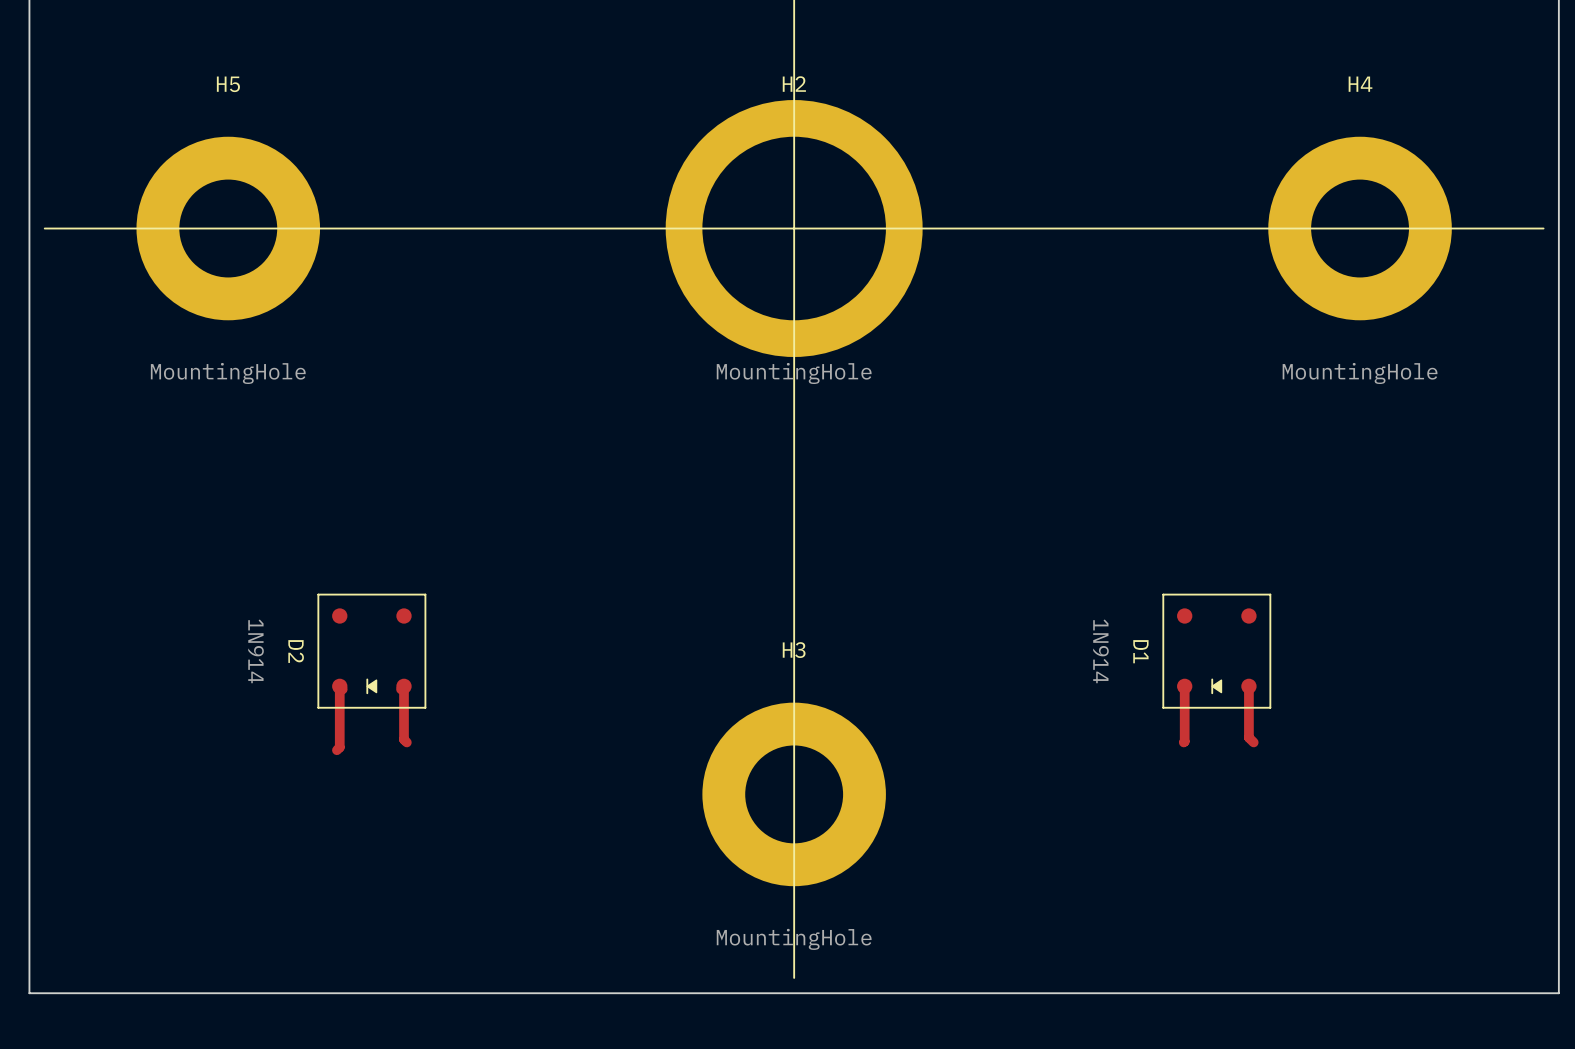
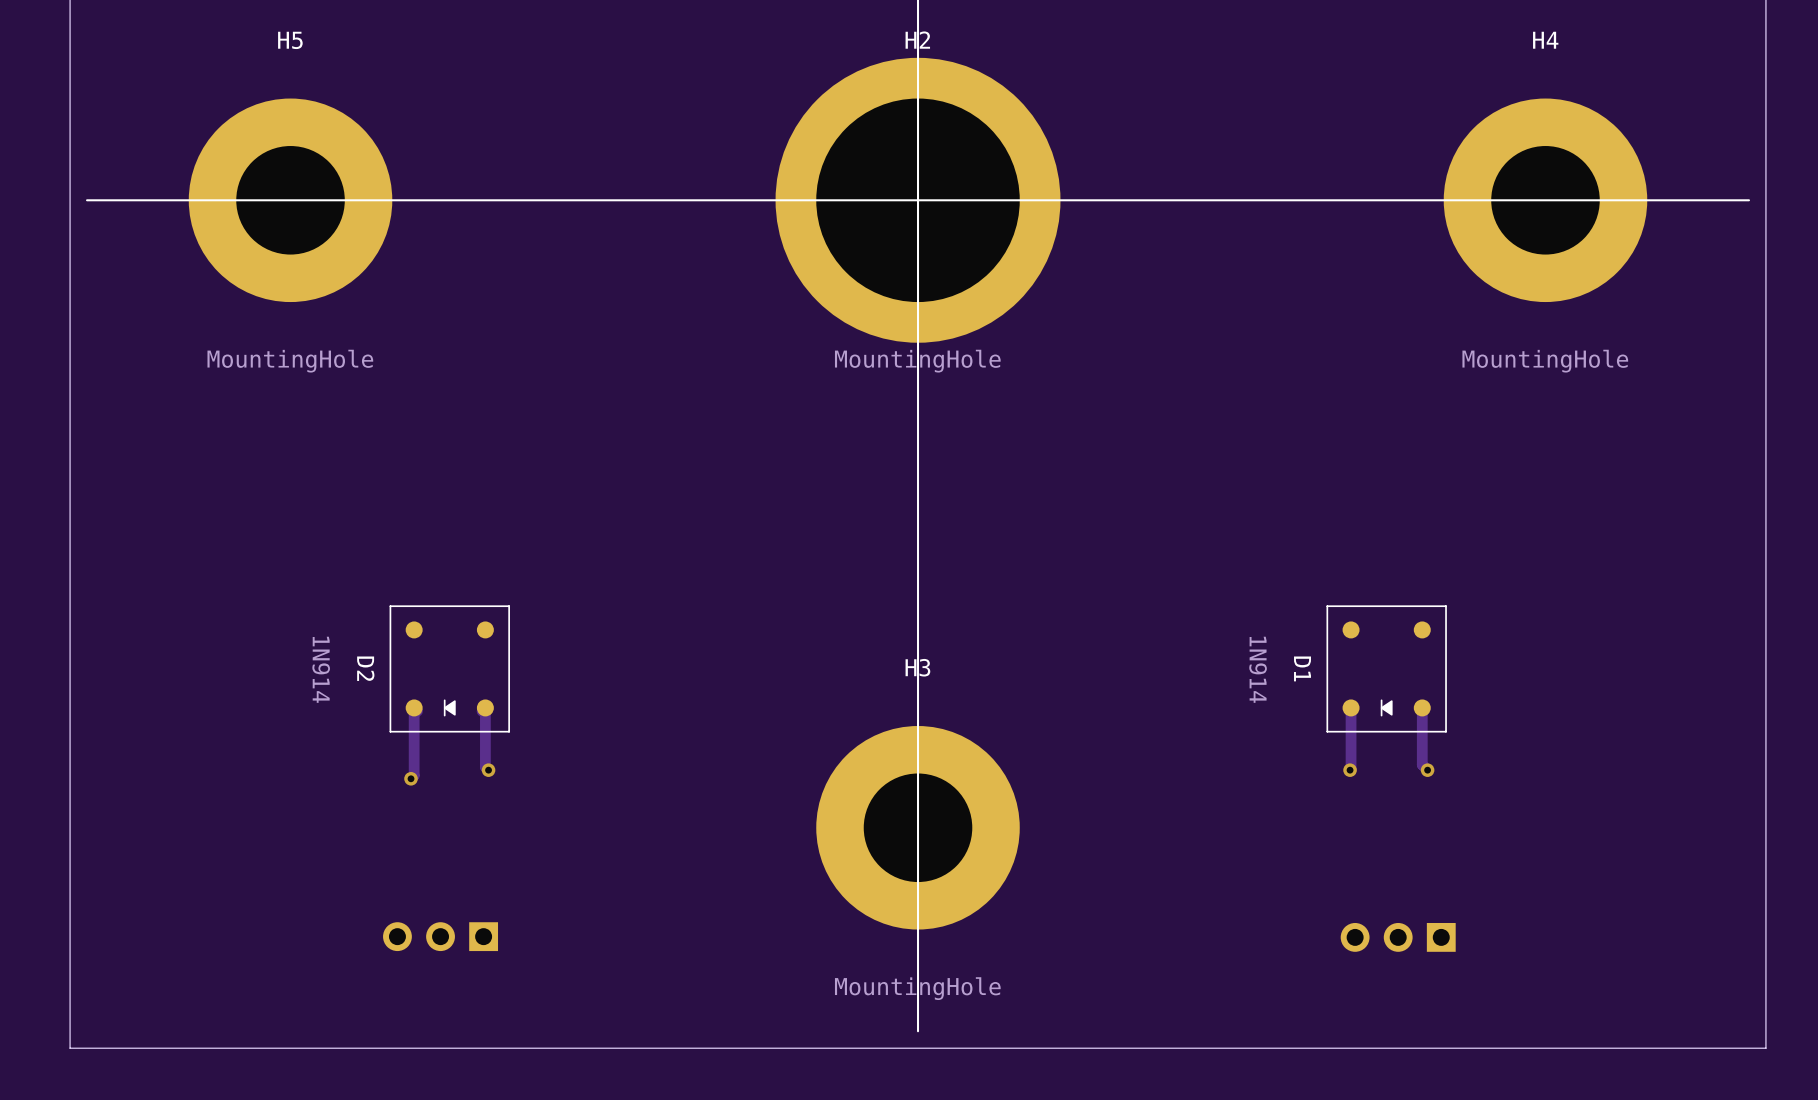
via: none -> (488, 770)
via: none -> (1350, 770)
via: none -> (1427, 770)
via: none -> (411, 778)
part: none -> (440, 936)
part: none -> (1398, 937)

